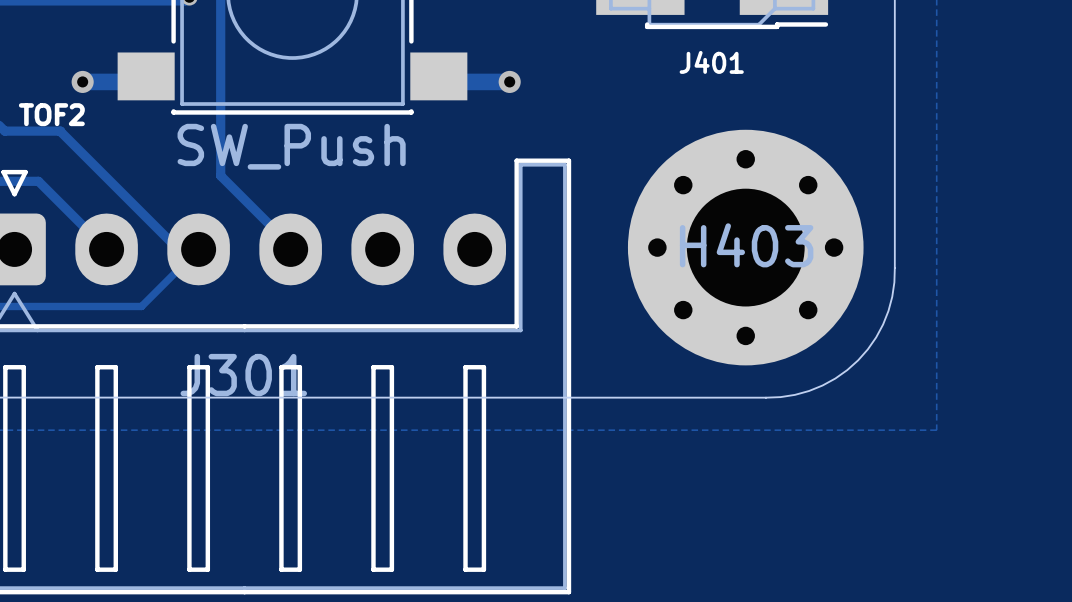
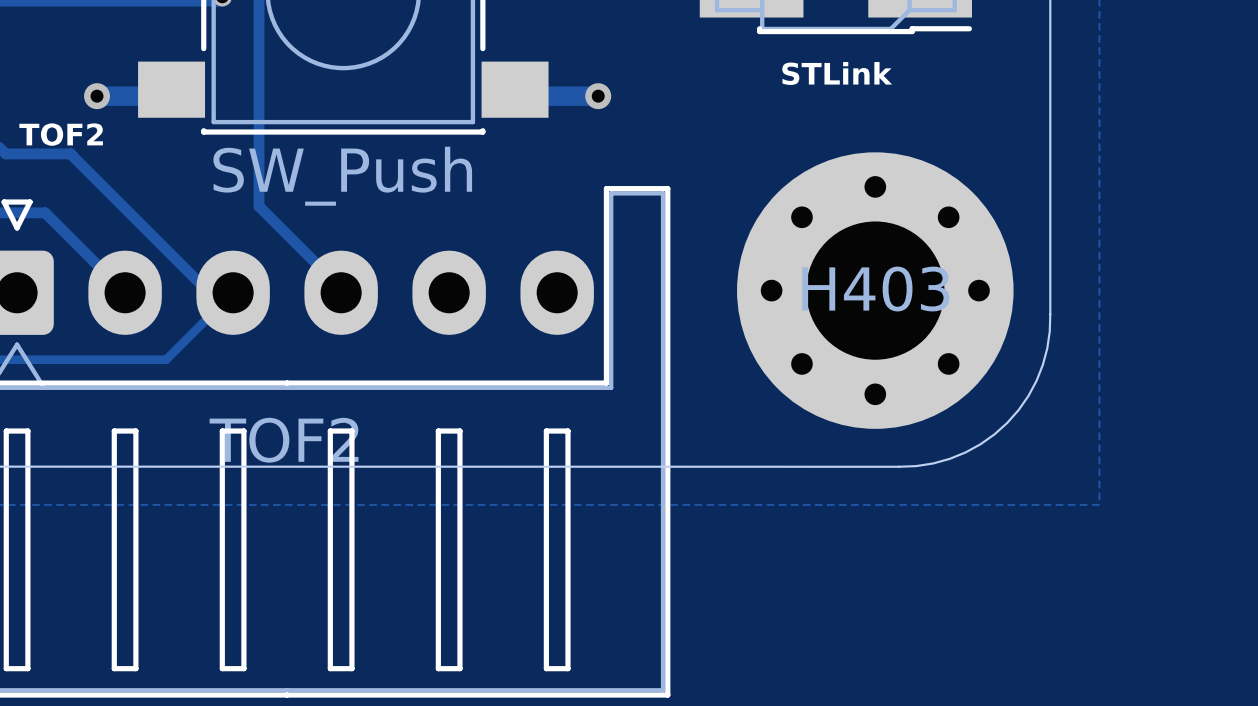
J401 name: J401 (711, 62) -> STLink (837, 73)
J301 name: J301 (243, 375) -> TOF2 (284, 440)

